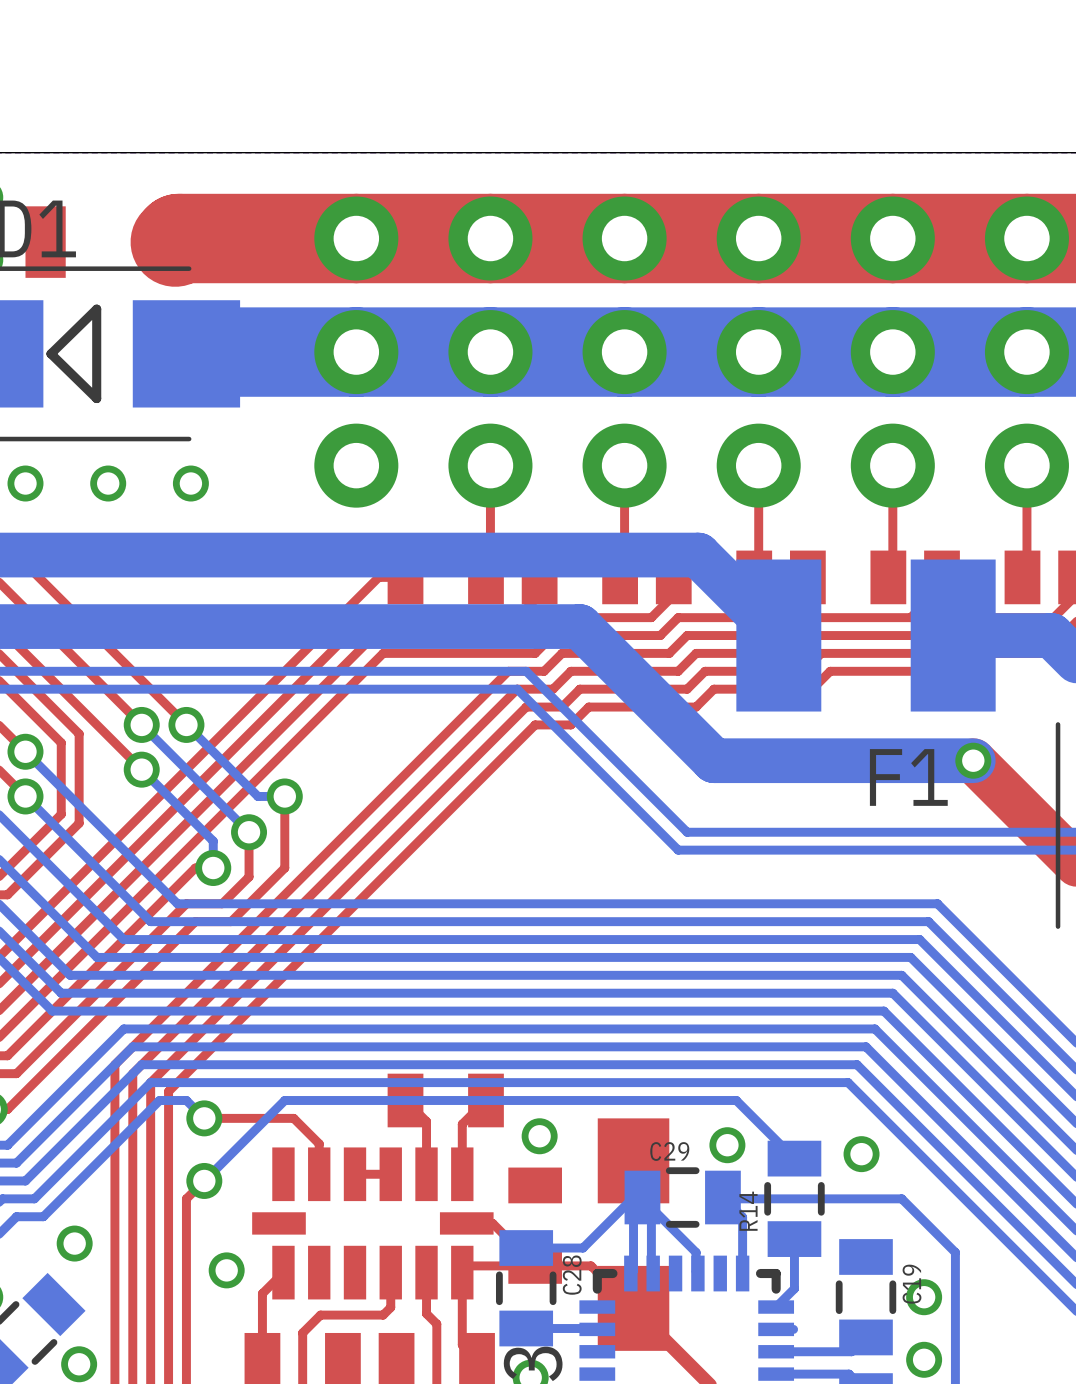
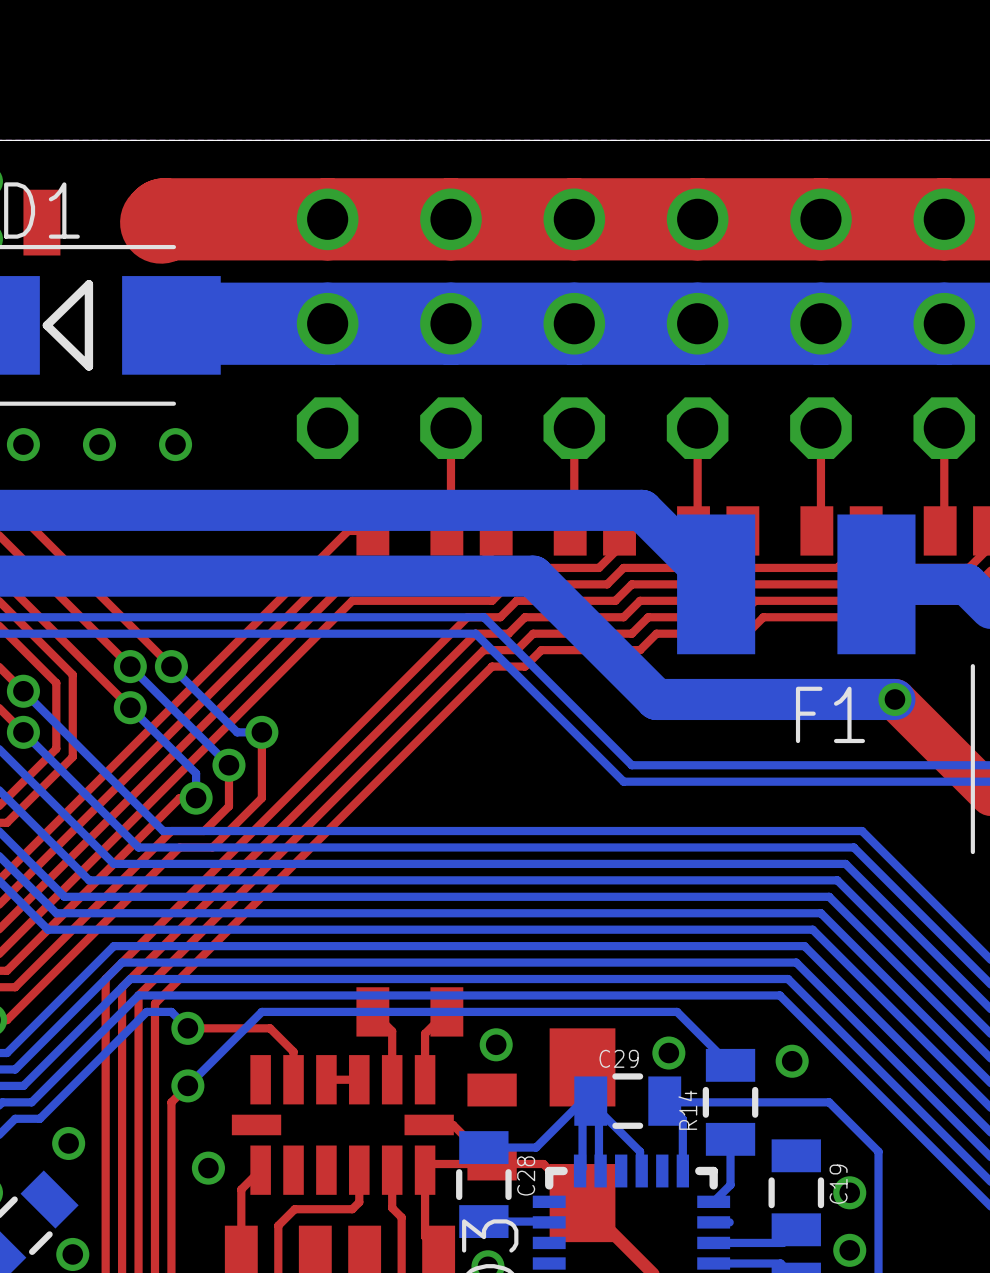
part footprint: [314, 196, 399, 508] -> [296, 188, 359, 459]
part footprint: [448, 196, 533, 508] -> [420, 188, 482, 459]
part footprint: [582, 196, 667, 508] -> [543, 188, 606, 459]
part footprint: [716, 196, 801, 508] -> [666, 188, 729, 459]
part footprint: [850, 196, 935, 508] -> [790, 188, 852, 459]
part footprint: [984, 196, 1069, 508] -> [913, 188, 976, 459]

